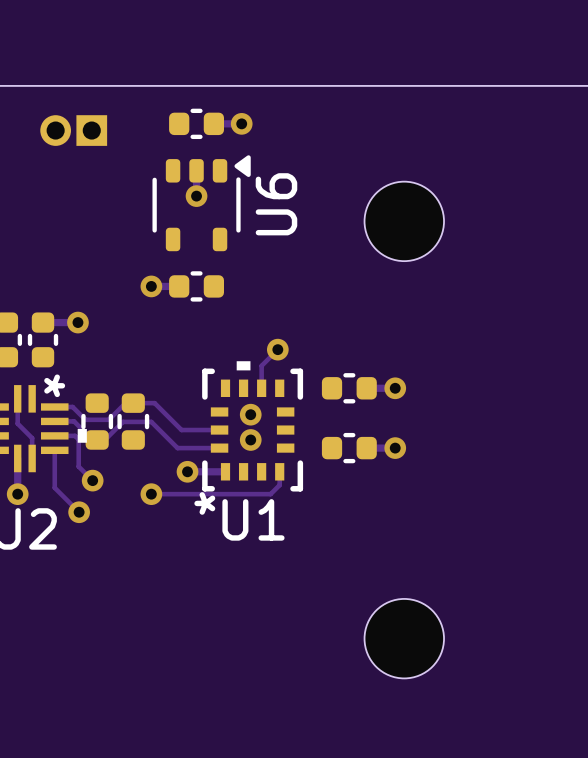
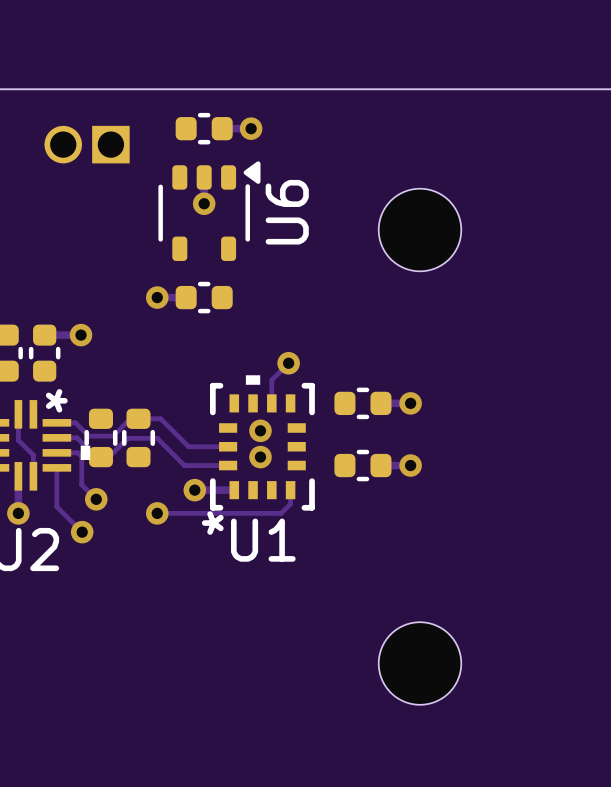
part footprint: [40, 115, 108, 146] -> [44, 125, 130, 164]

